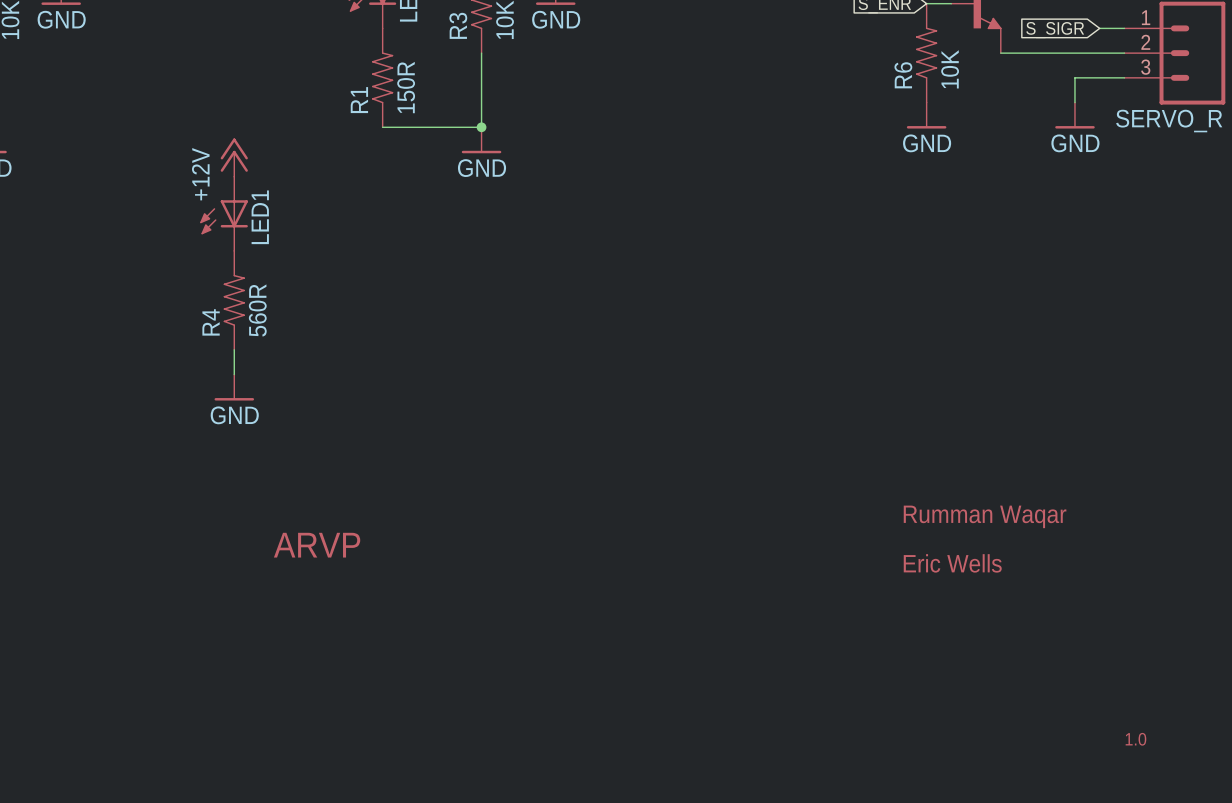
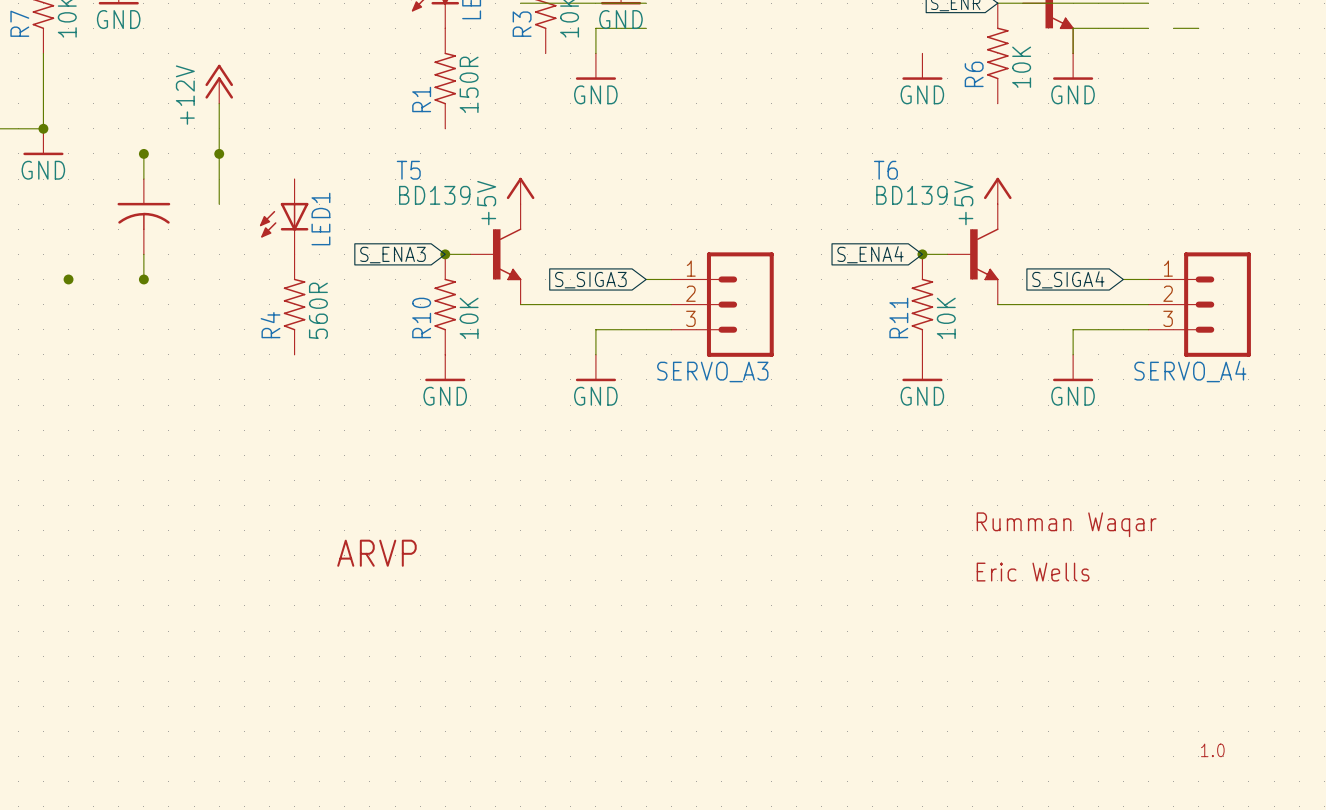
wire: none -> (520, 3) (646, 3)
wire: none -> (1022, 3) (1148, 3)
wire: none -> (646, 28) (595, 28) (595, 53)
global label: S_SIGR (1055, 30) -> none
wire: (481, 53) (481, 127) (382, 127) -> none
wire: (1000, 53) (1124, 53) -> (1073, 53) (1073, 28) (1148, 28)
SERVO_R: (1174, 53) -> none
power symbol: none -> GND (922, 66)
power symbol: none -> GND (1073, 66)
wire: (1124, 77) (1074, 77) (1074, 102) -> none
wire: none -> (219, 103) (219, 204)
power symbol: GND (926, 115) -> none
power symbol: GND (1074, 115) -> none
junction: (481, 127) -> none
power symbol position: GND (481, 140) -> GND (595, 66)
wire: none -> (143, 153) (143, 179)
junction: none -> (143, 153)
junction: none -> (219, 153)
power symbol position: +12V (234, 157) -> +12V (219, 84)
power symbol: none -> +5V (520, 190)
power symbol: none -> +5V (997, 190)
part: none -> (143, 216)
wire: none -> (445, 254) (470, 254)
junction: none -> (445, 254)
T5: none -> BD139 (495, 254)
wire: none -> (922, 254) (947, 254)
junction: none -> (922, 254)
T6: none -> BD139 (973, 254)
global label: none -> S_ENA3 (392, 255)
global label: none -> S_ENA4 (870, 254)
junction: none -> (68, 279)
junction: none -> (143, 279)
wire: none -> (646, 279) (671, 279)
wire: none -> (1123, 279) (1148, 279)
global label: none -> S_SIGA3 (590, 280)
global label: none -> S_SIGA4 (1068, 279)
R10: none -> 10K (445, 304)
wire: none -> (520, 304) (671, 304)
SERVO_A3: none -> (722, 304)
R11: none -> 10K (922, 304)
wire: none -> (997, 304) (1148, 304)
SERVO_A4: none -> (1199, 304)
wire: none -> (671, 329) (595, 329) (595, 354)
wire: none -> (1148, 329) (1073, 329) (1073, 354)
wire: (234, 349) (234, 374) -> (143, 254) (143, 279)
power symbol: none -> GND (445, 368)
power symbol: none -> GND (595, 368)
power symbol: none -> GND (922, 368)
power symbol: none -> GND (1073, 368)
power symbol: GND (234, 387) -> none

